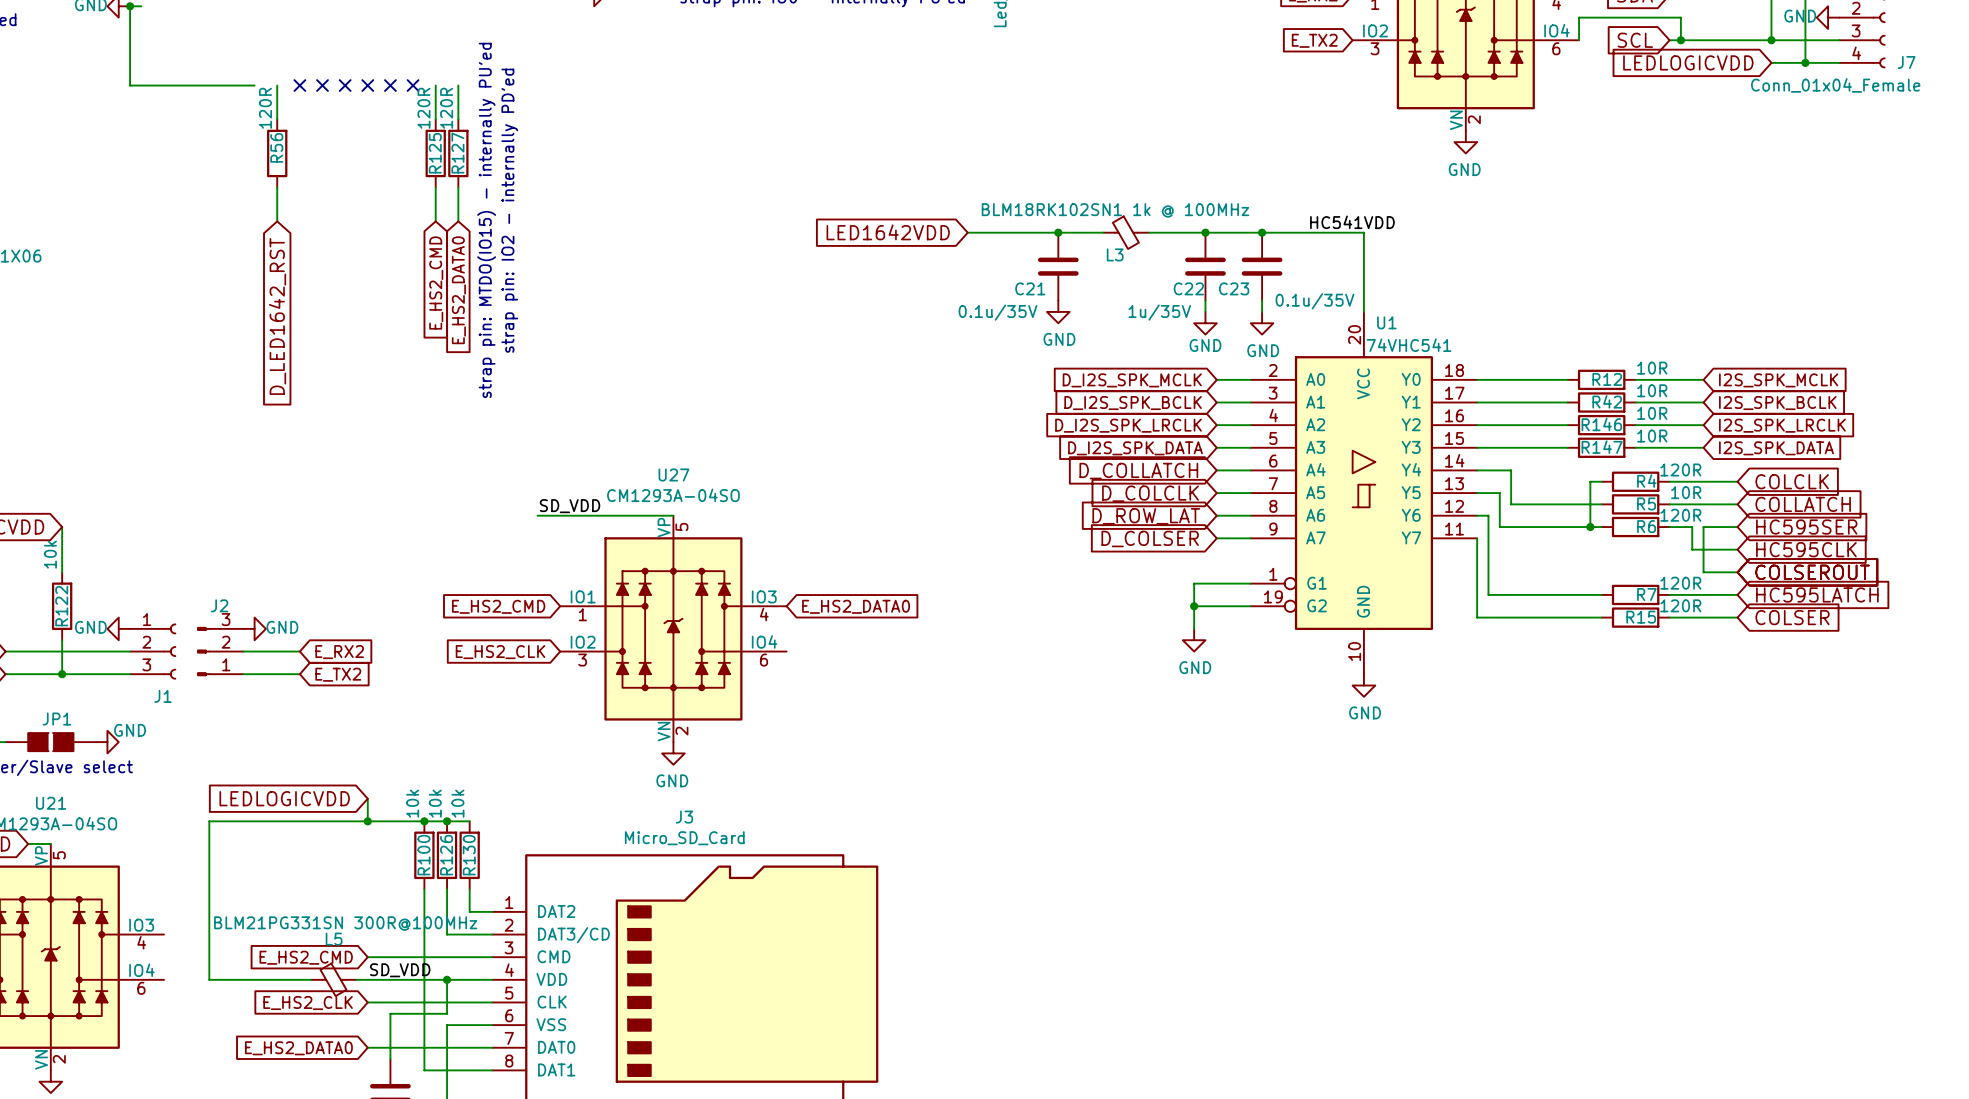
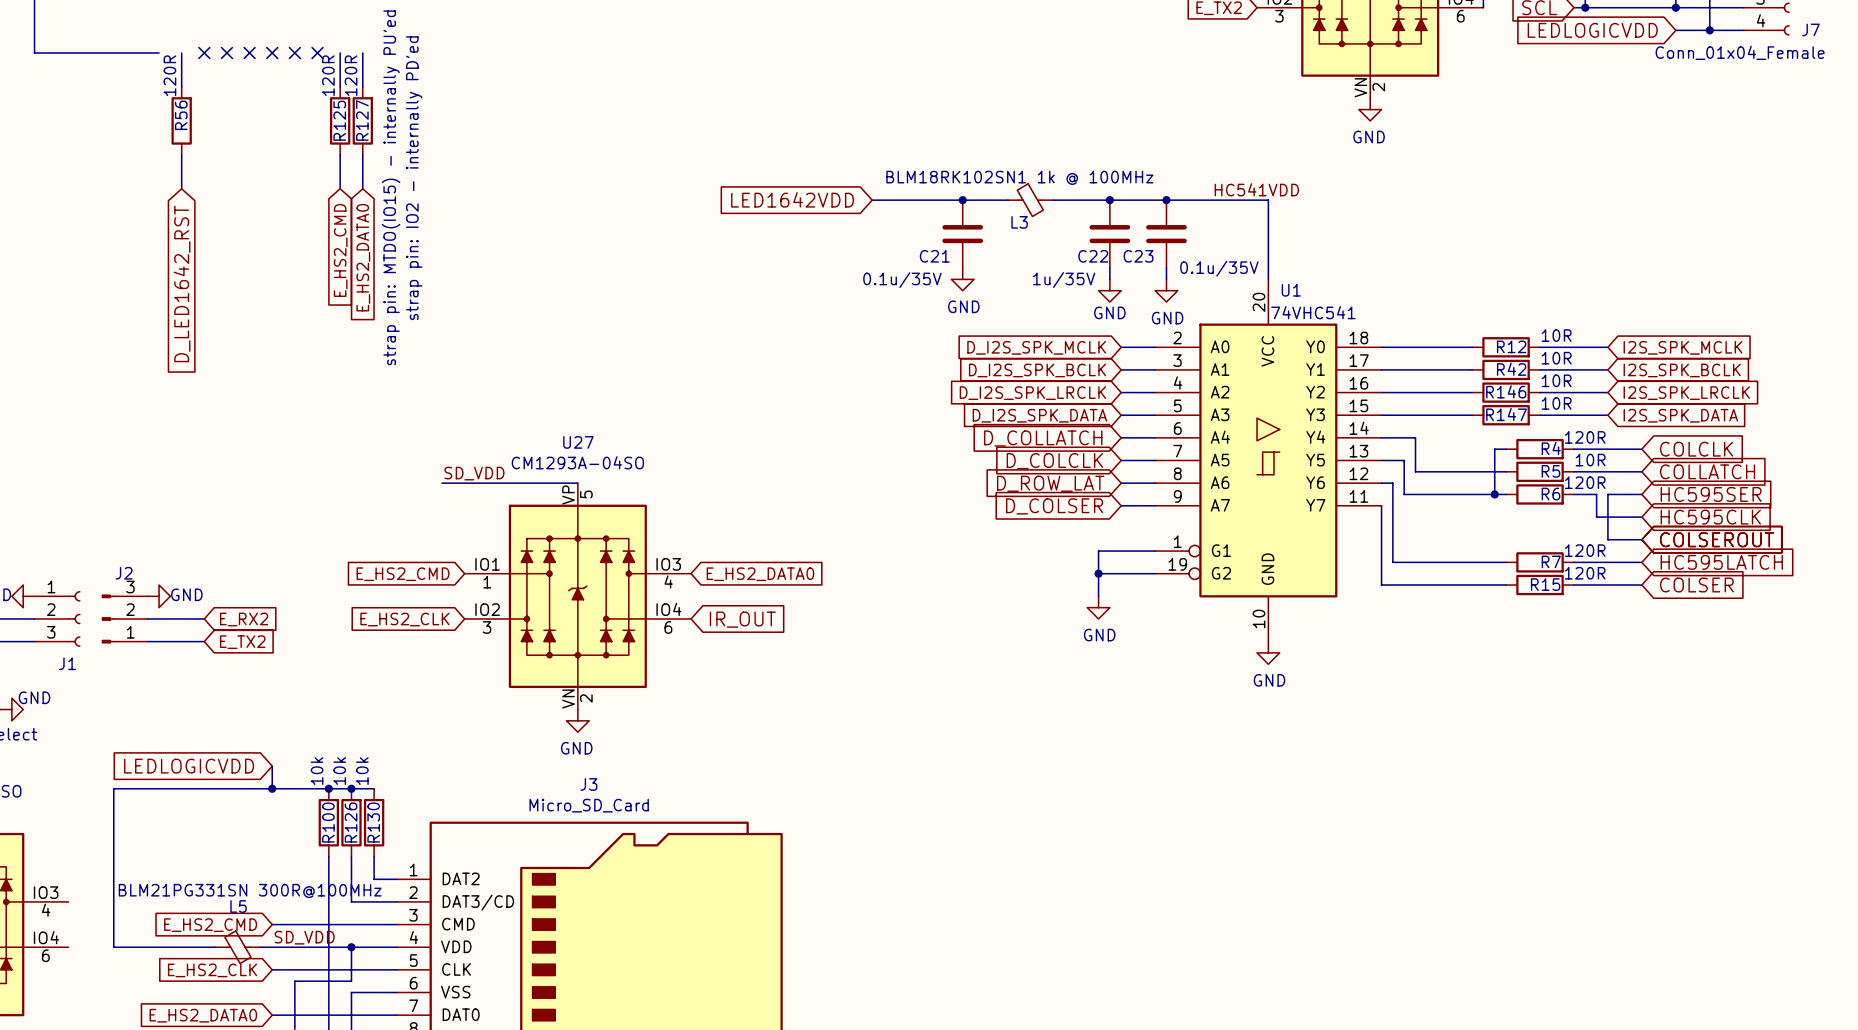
global label: none -> IR_OUT (742, 619)

